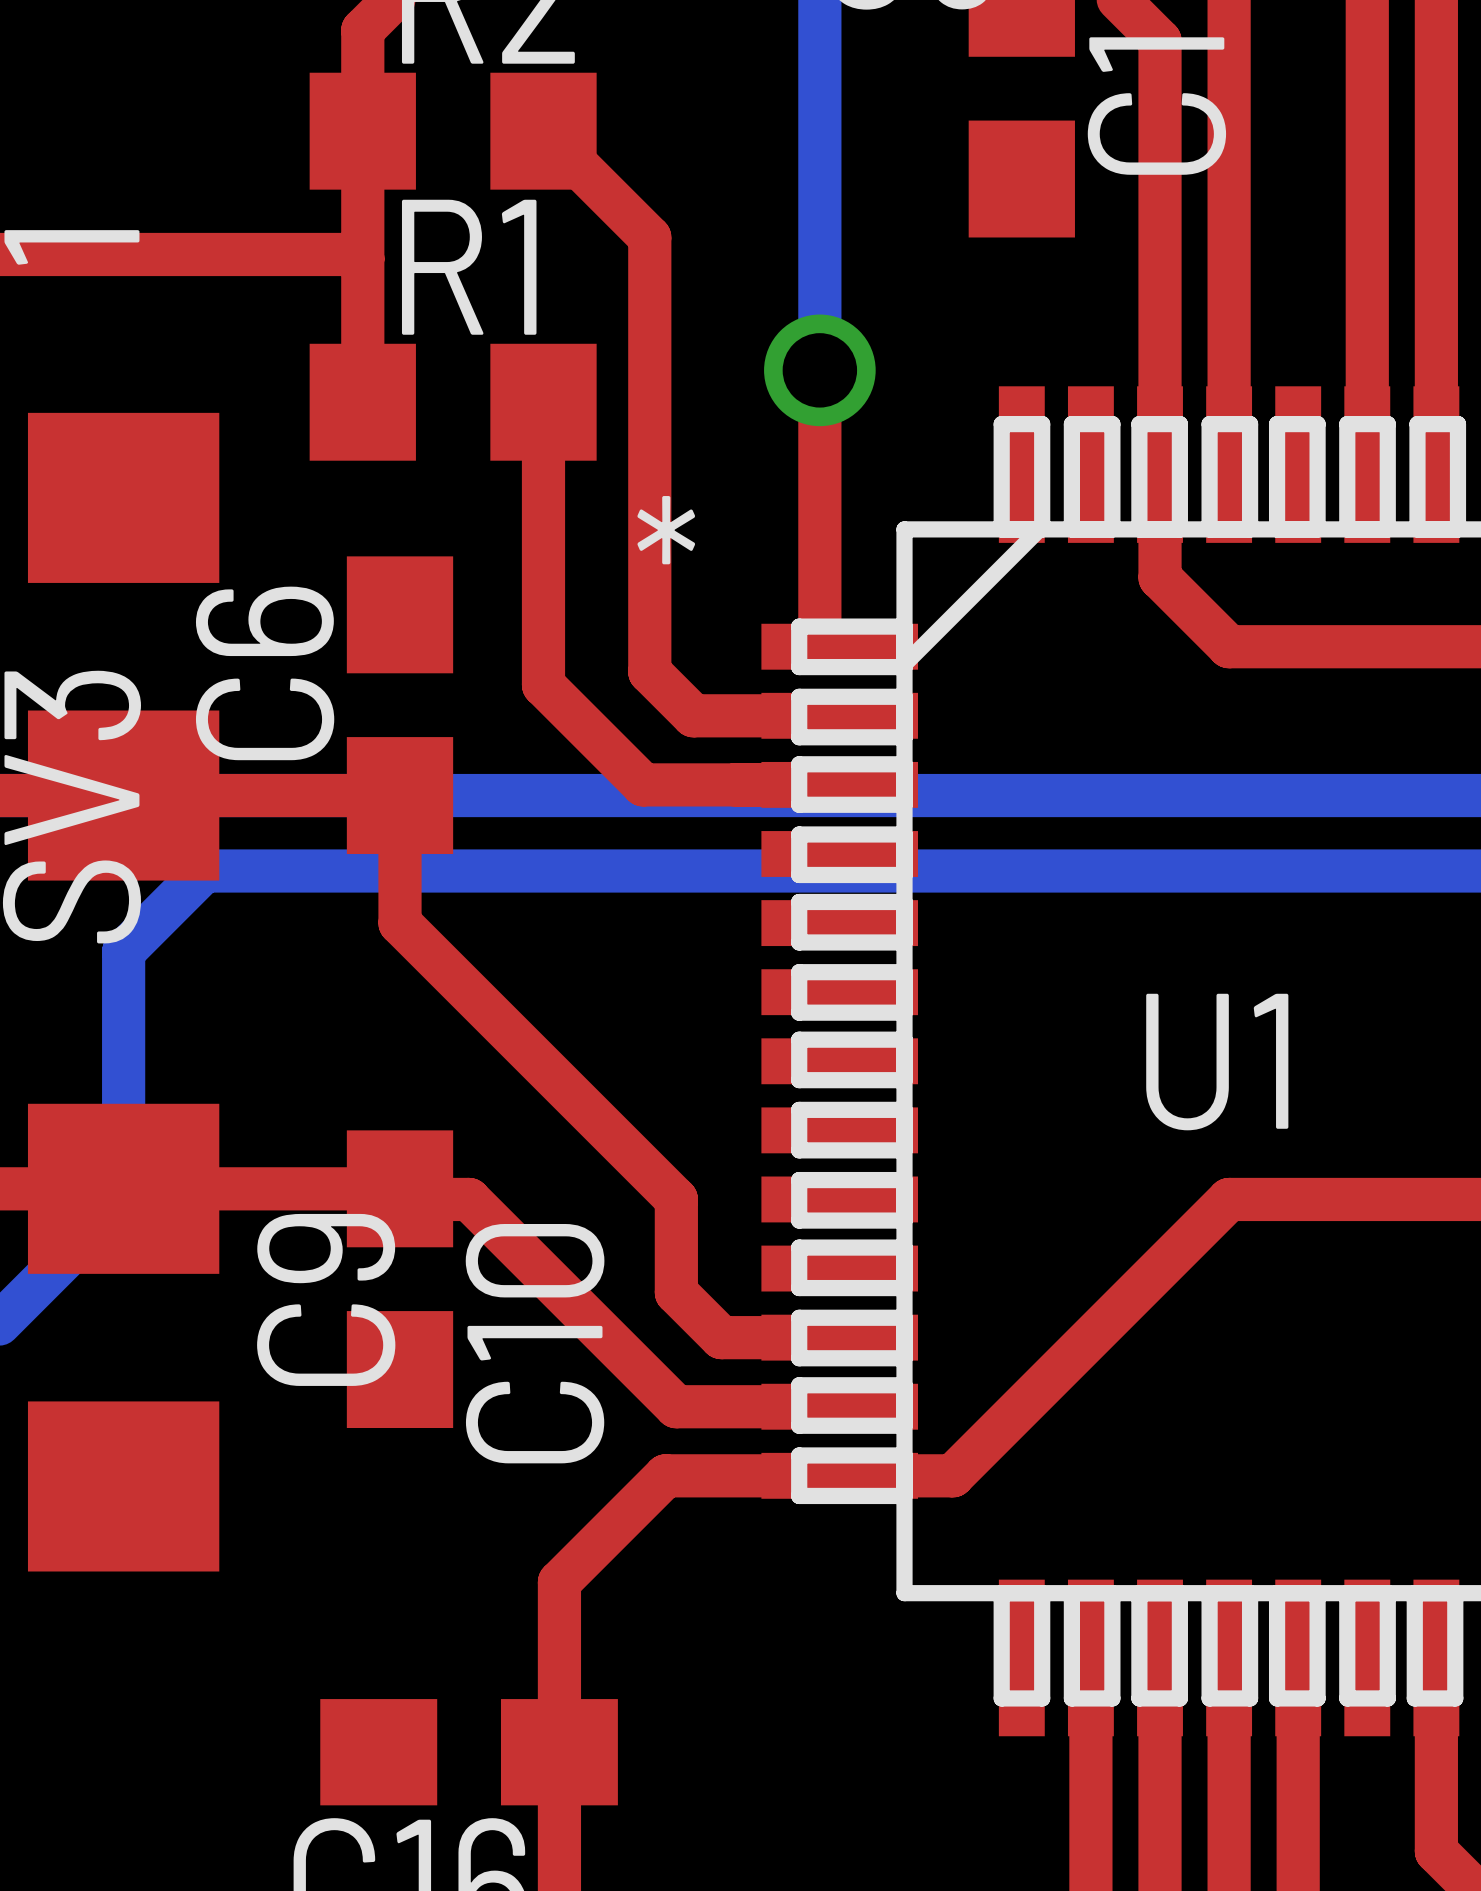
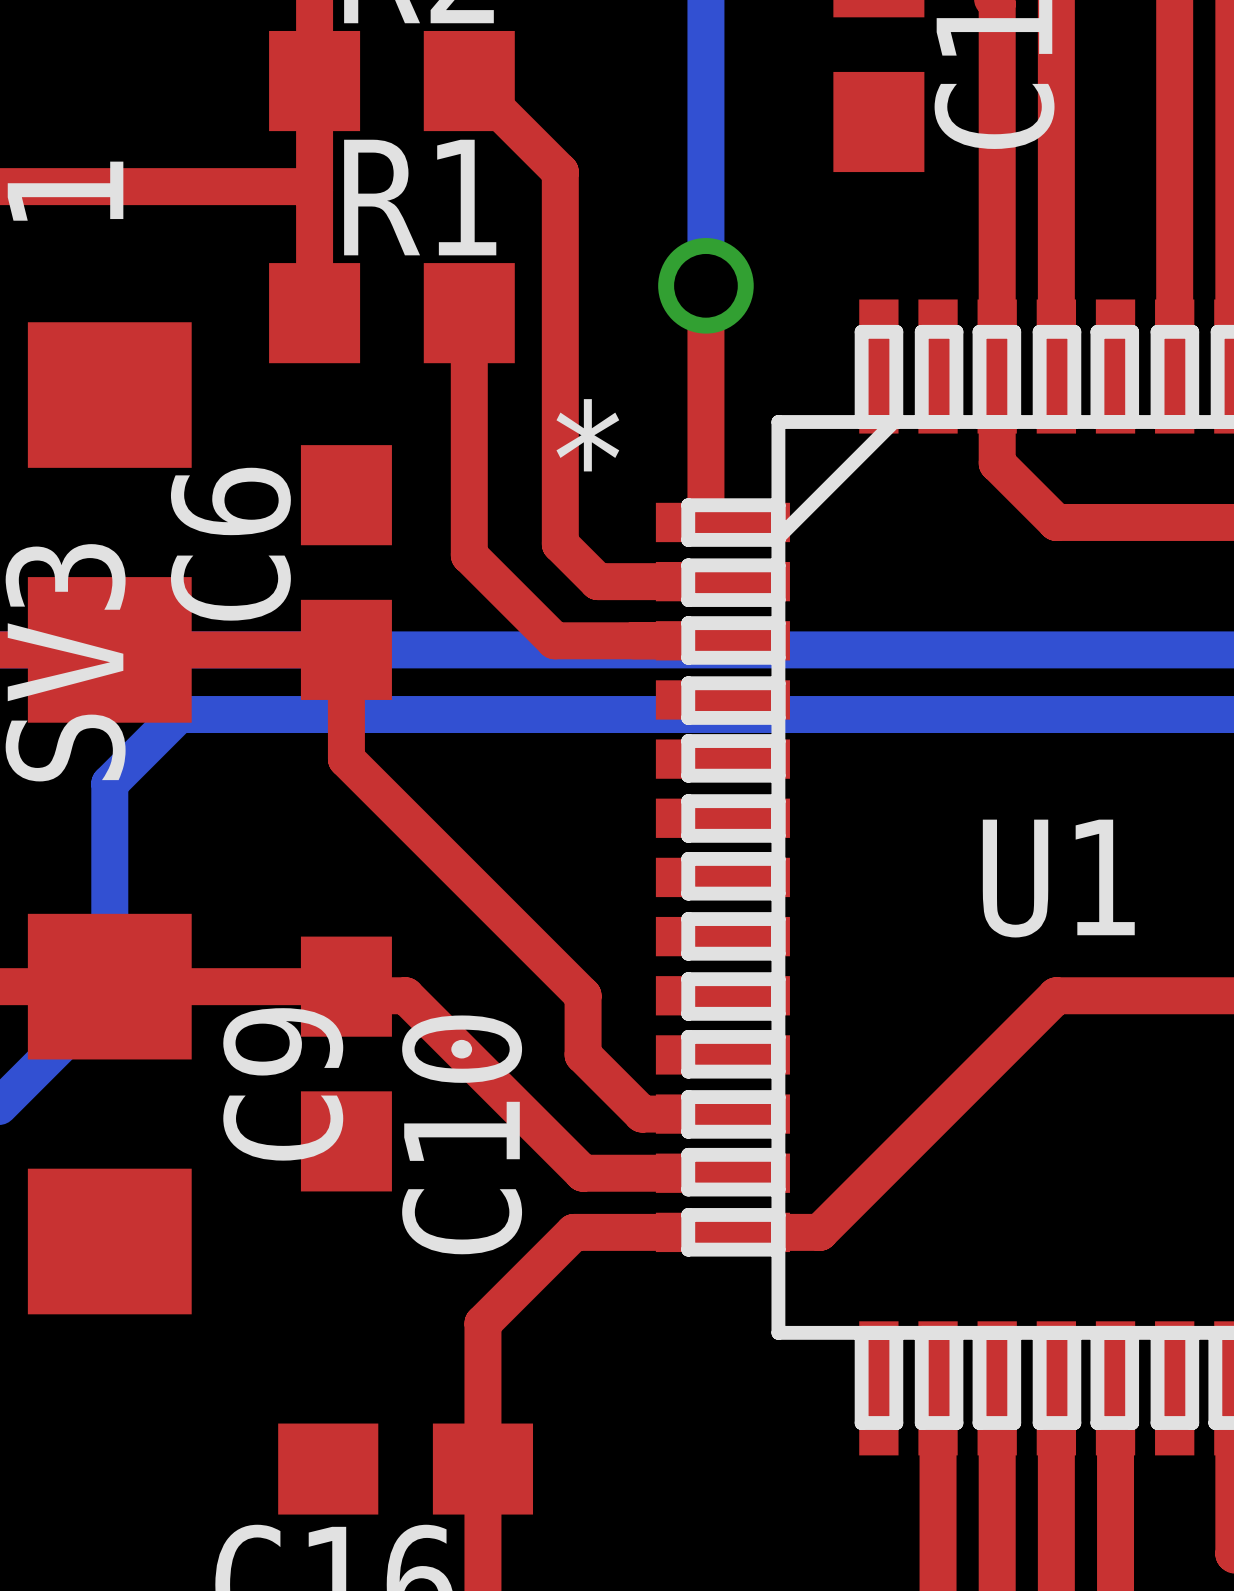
top track: (676, 1268) (676, 1292) (721, 1337) (745, 1337) -> (583, 1054) (642, 1114)

